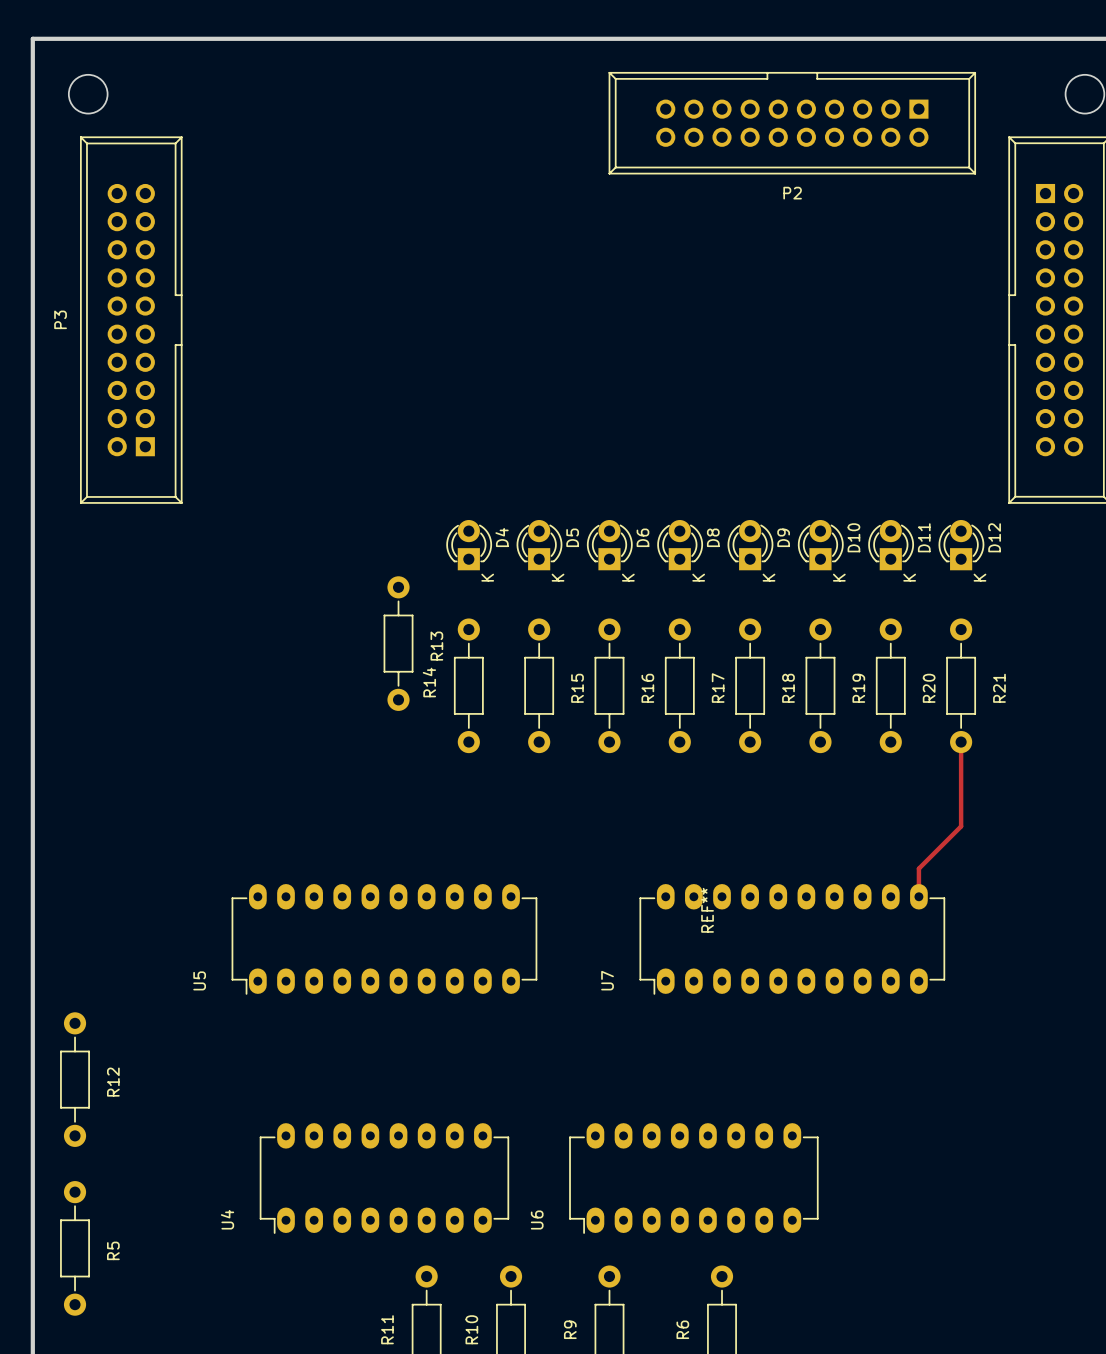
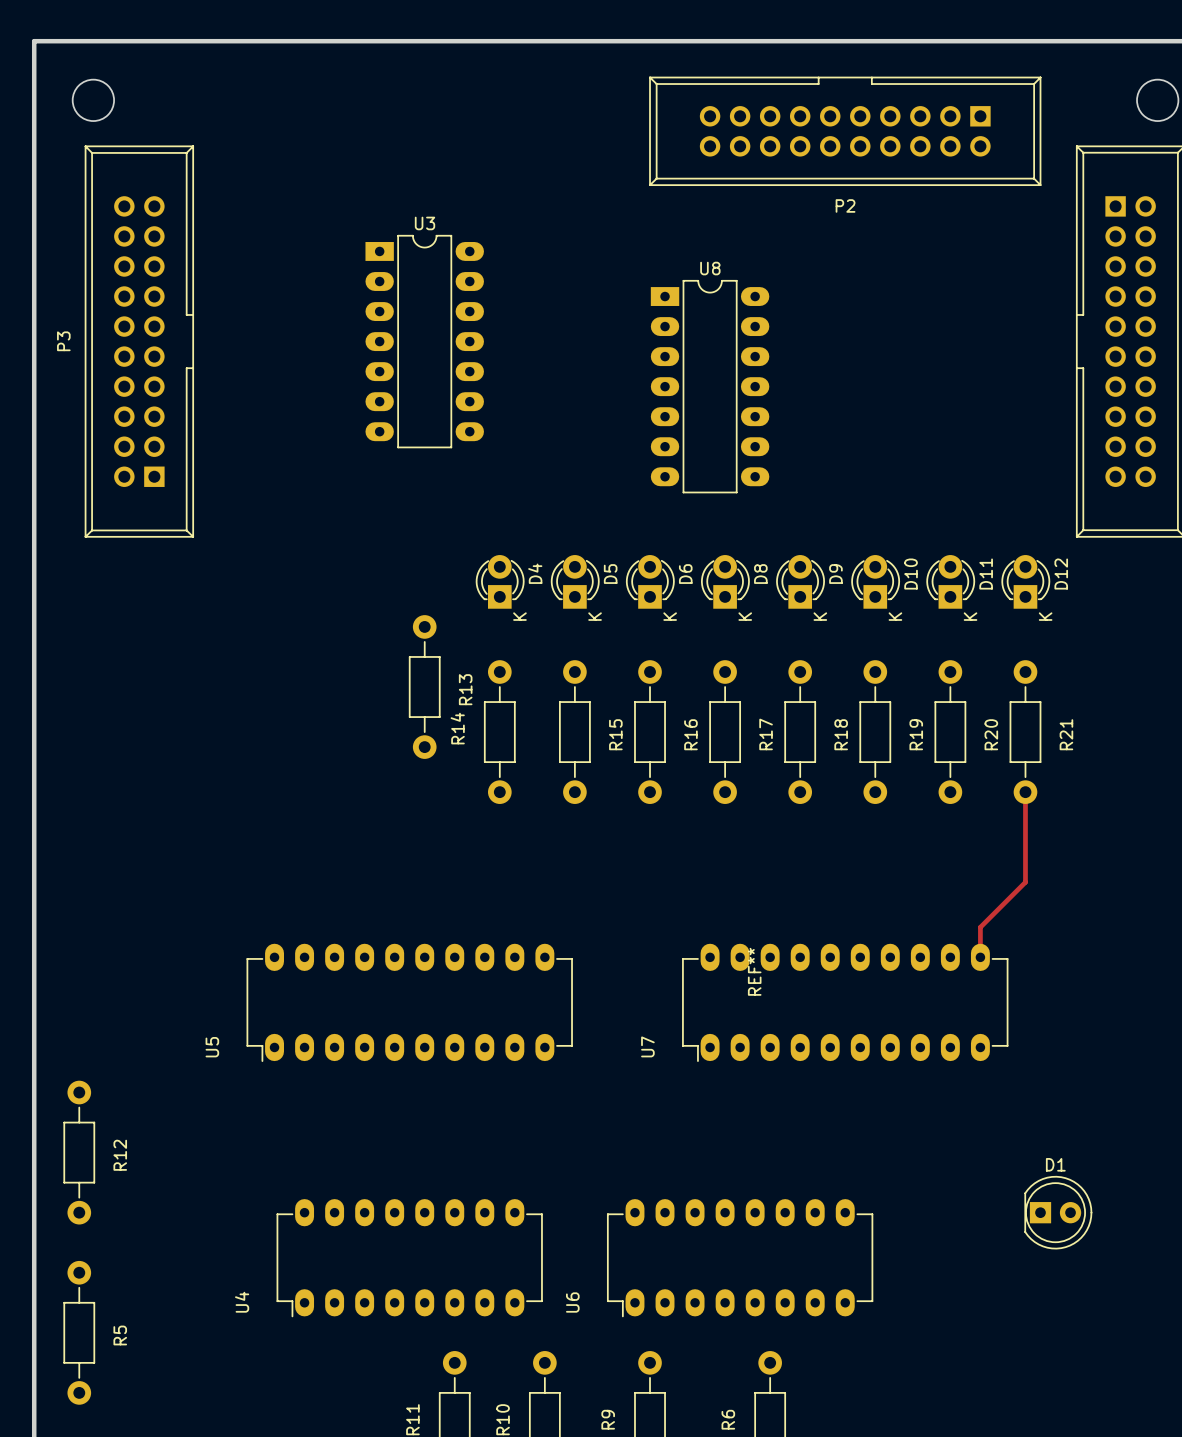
U3: none -> (424, 341)
U8: none -> (710, 386)
D1: none -> (1058, 1212)

